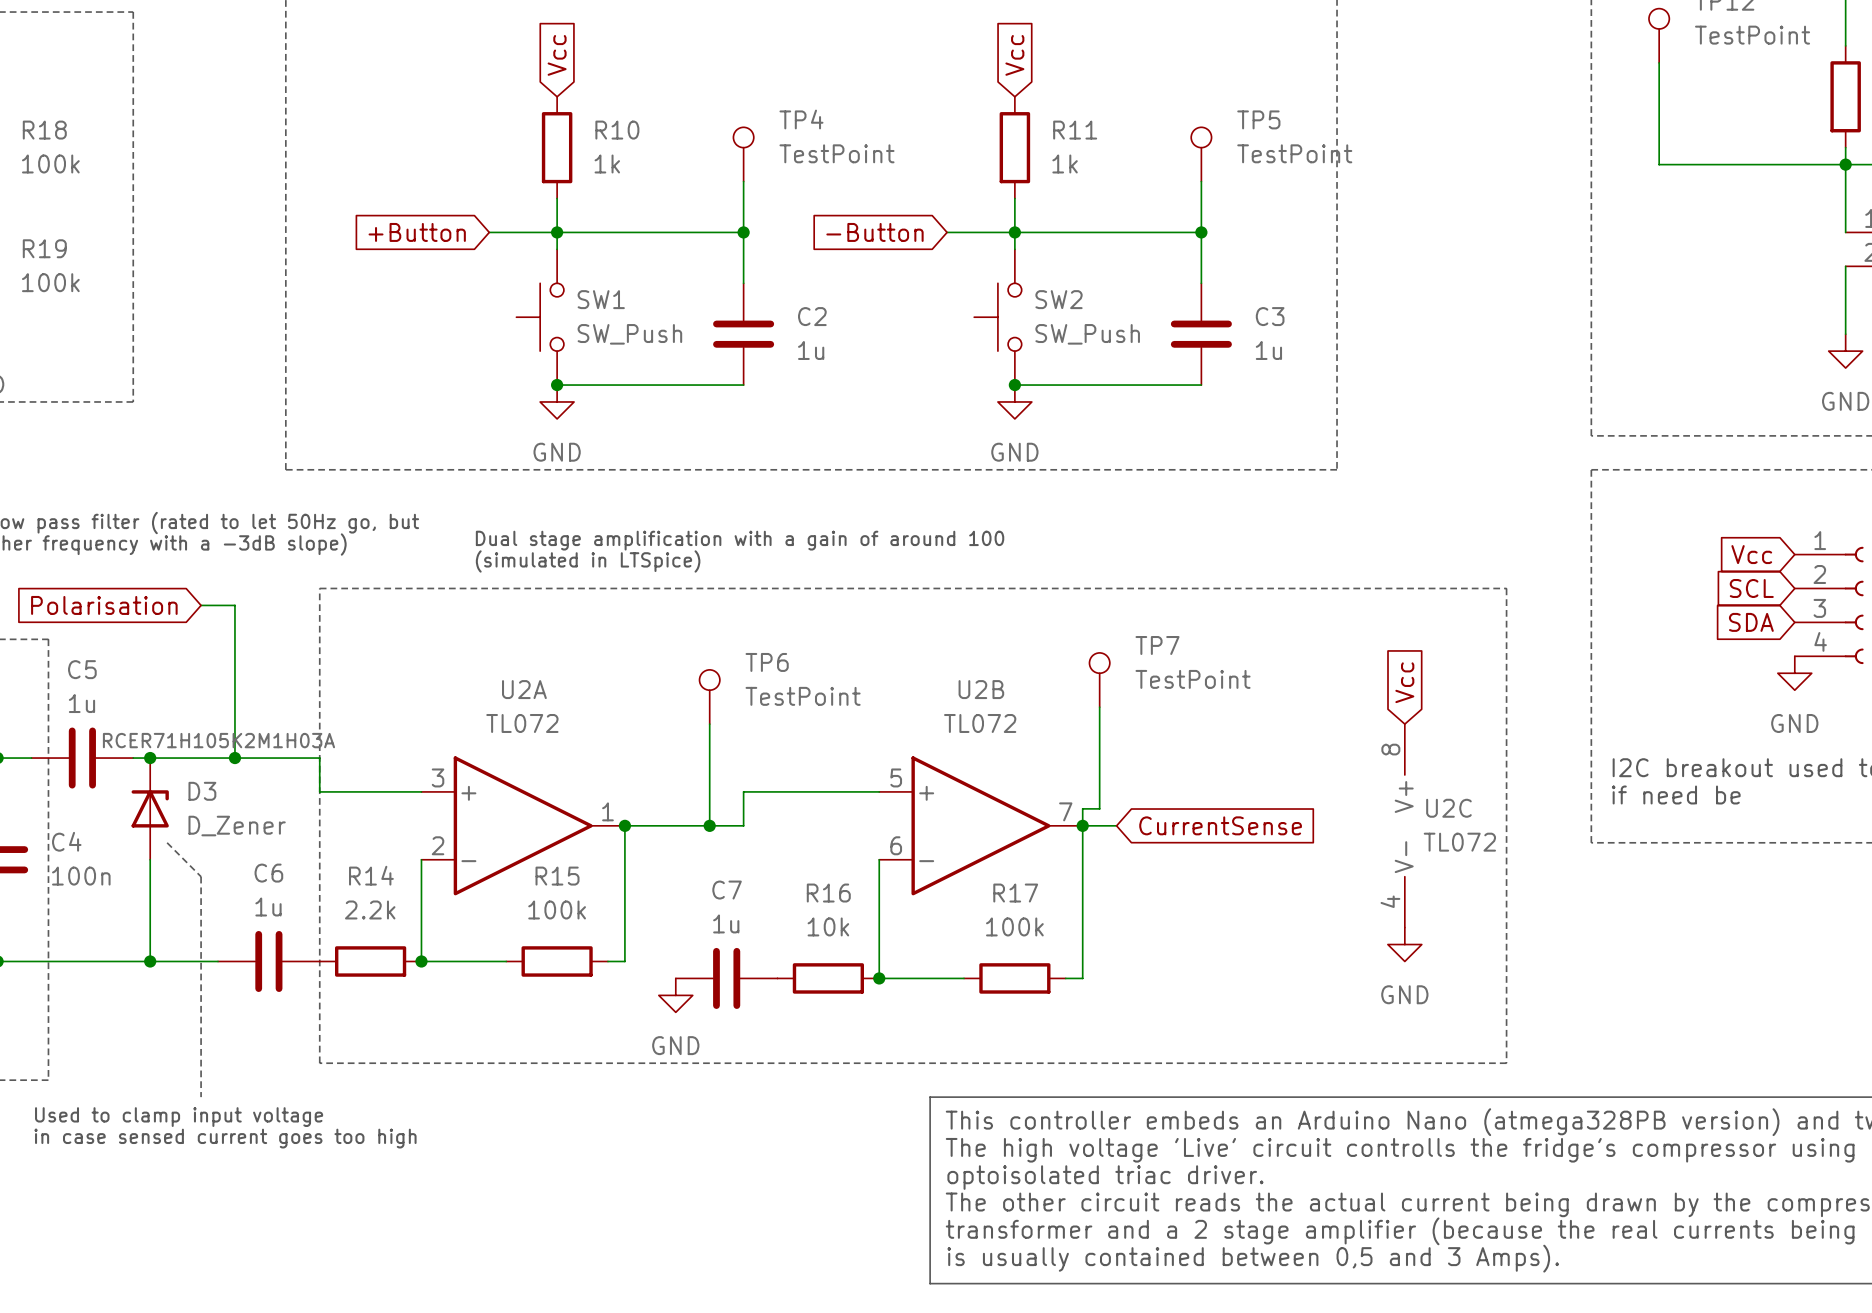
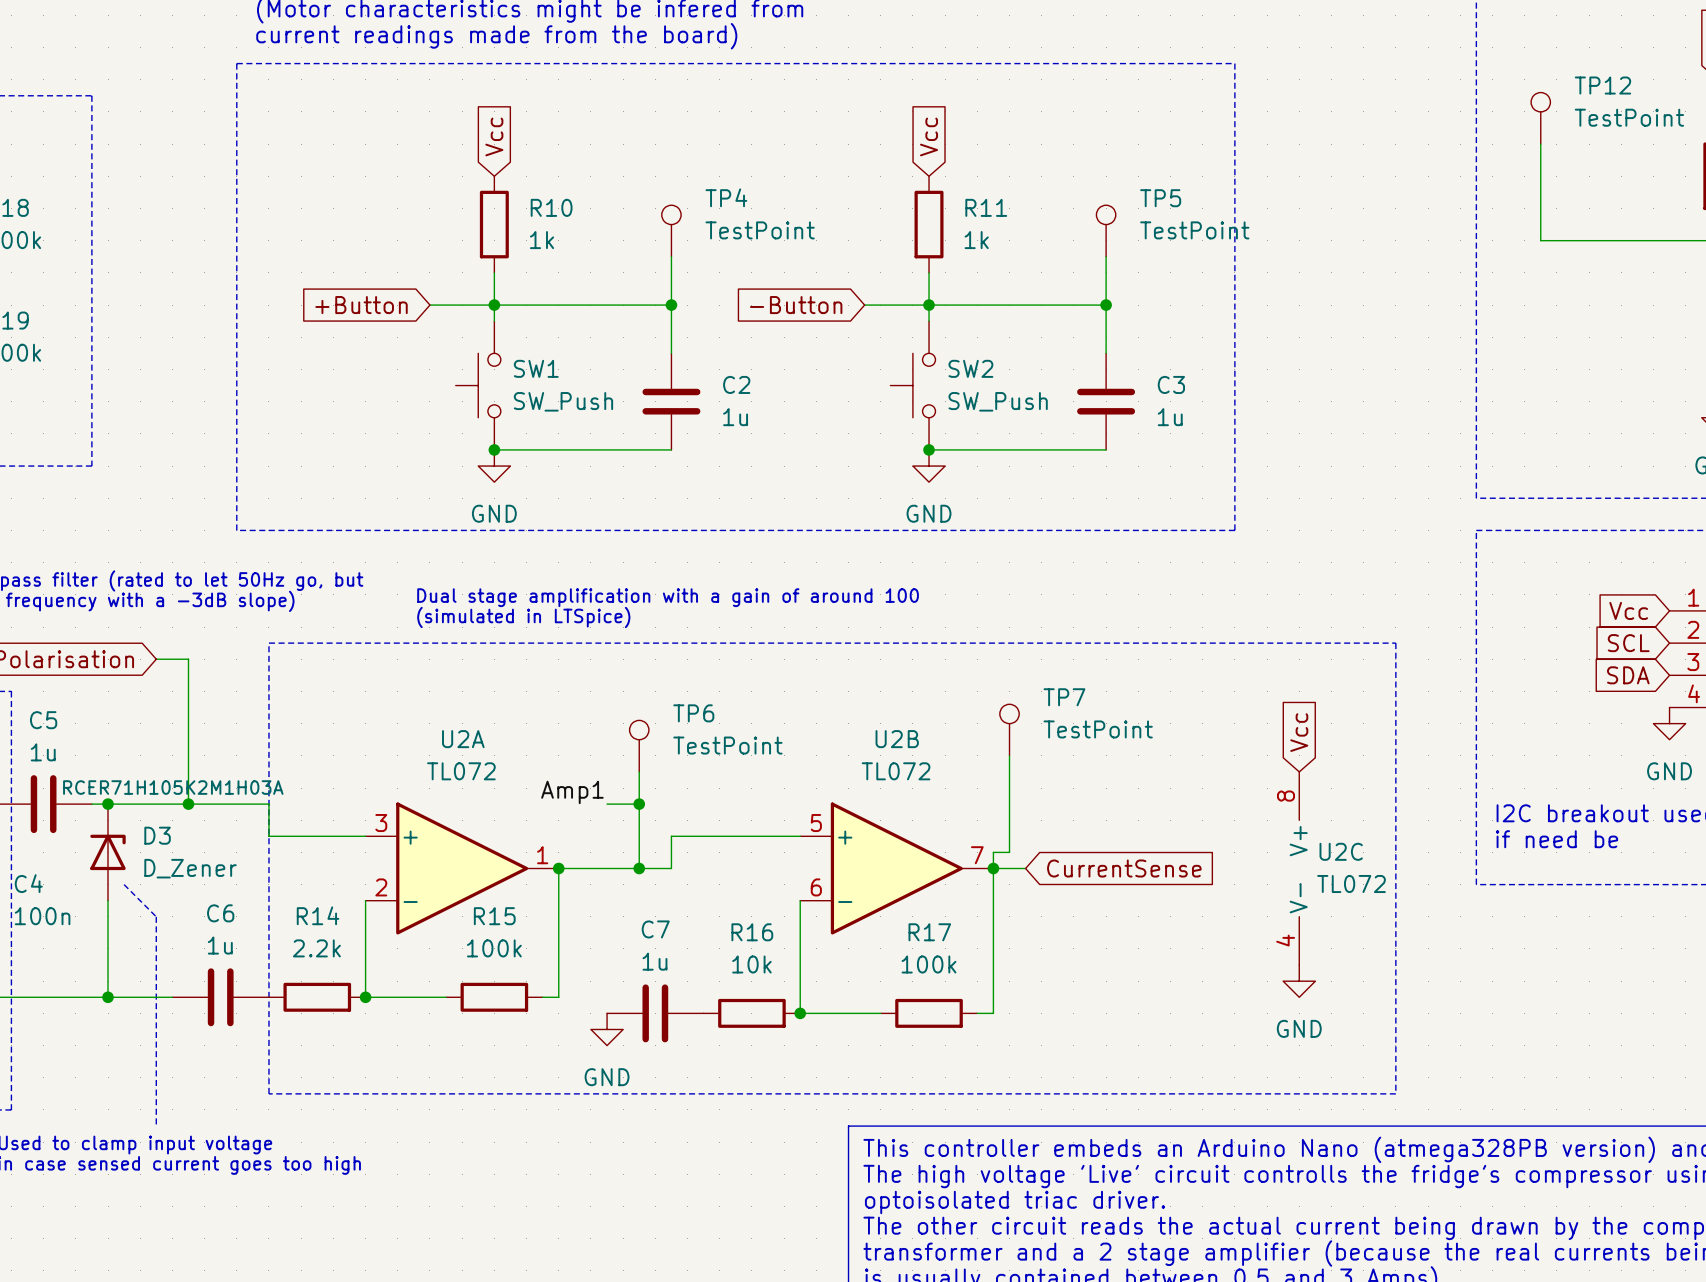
label: none -> Amp1 (572, 792)
wire: none -> (607, 804) (639, 804)
junction: none -> (639, 804)

